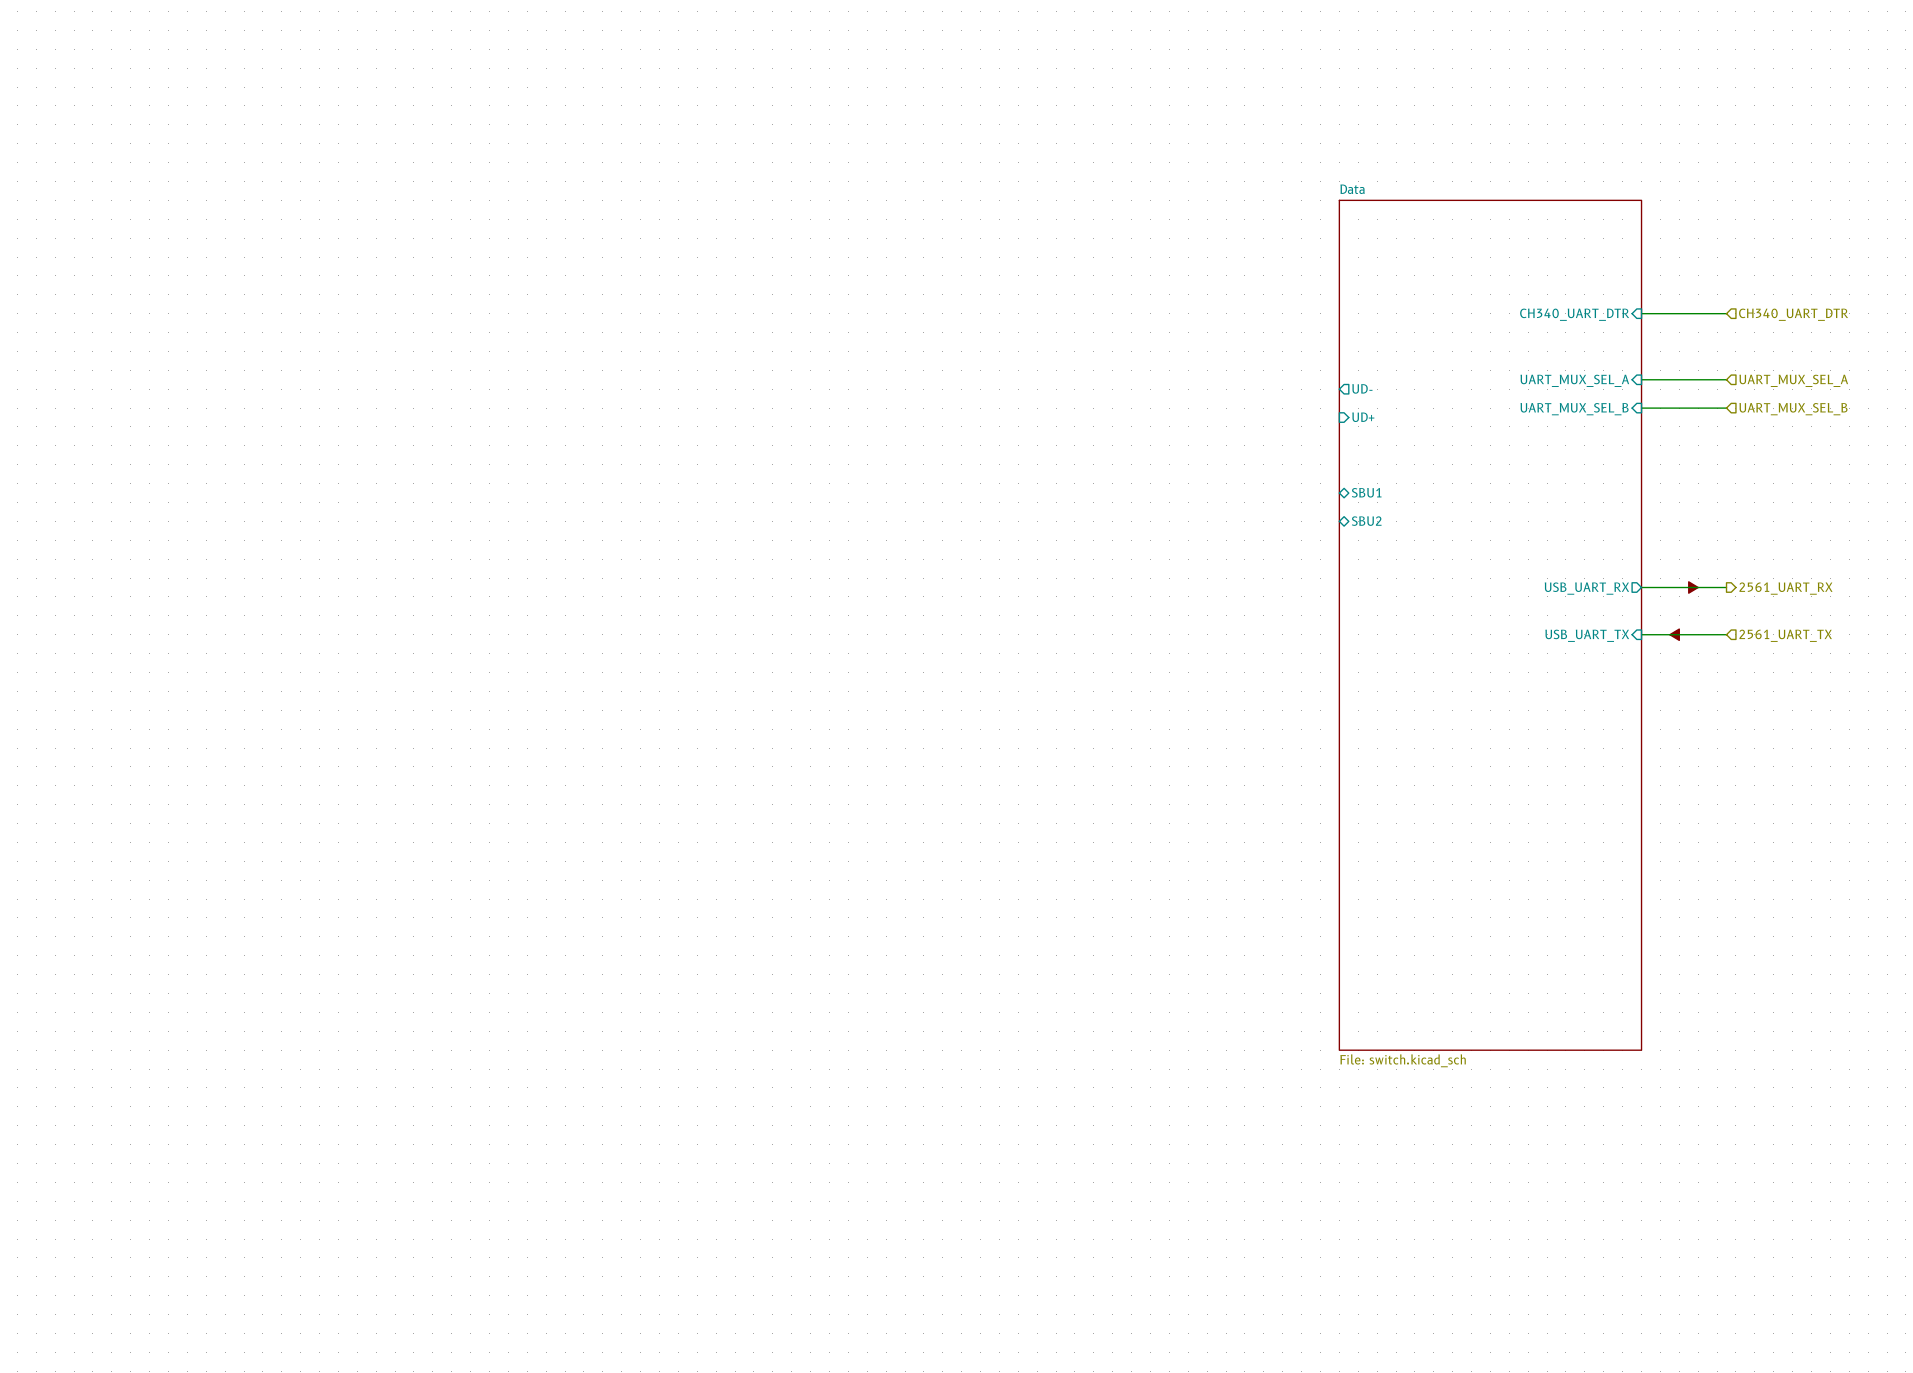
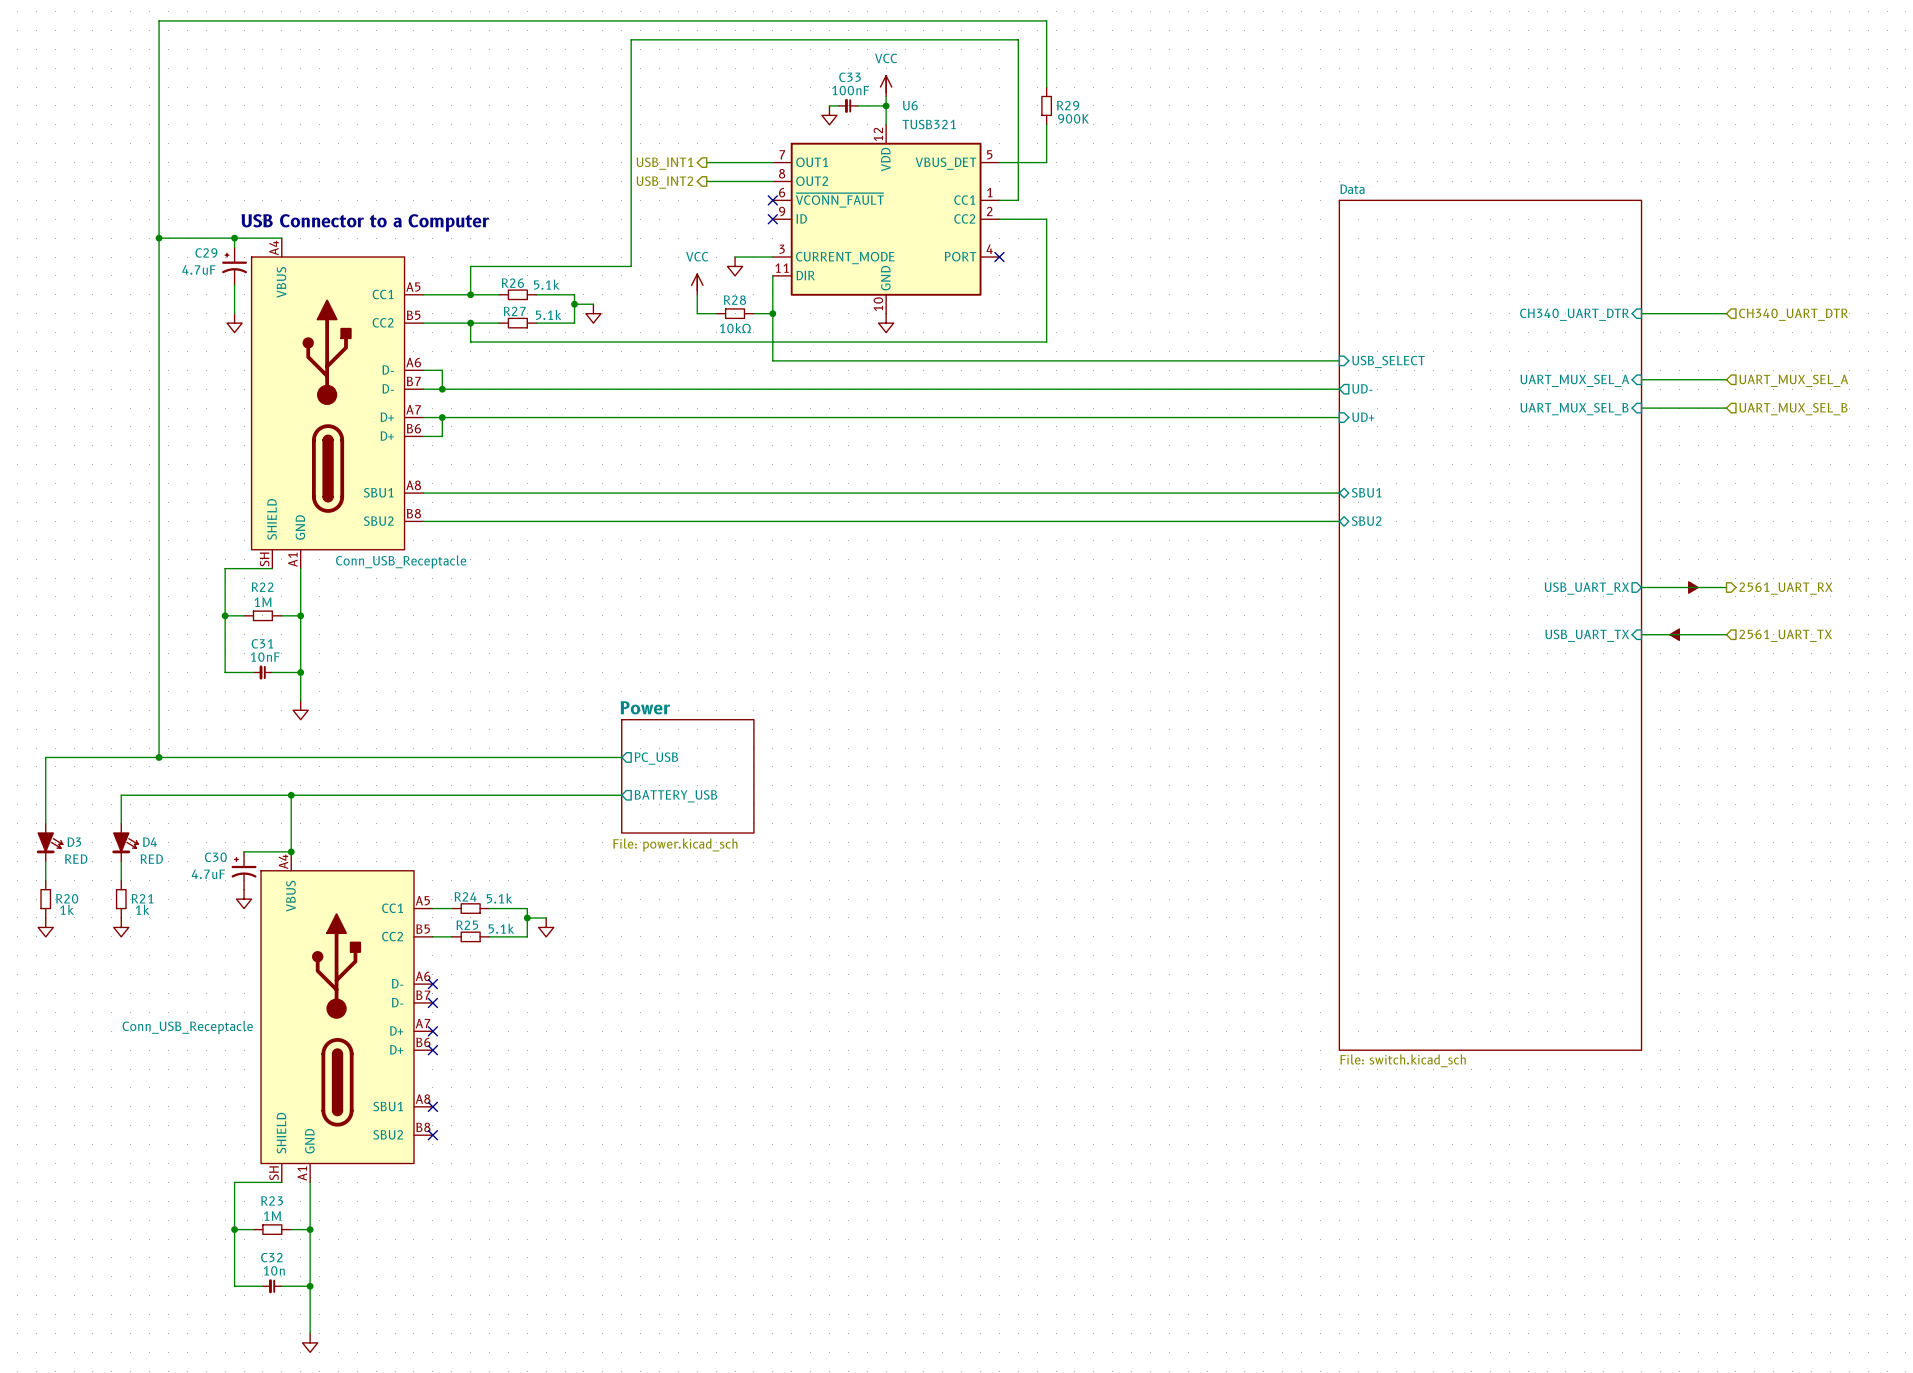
power symbol: none -> VCC (886, 86)
wire: none -> (1046, 87) (1046, 20) (159, 20) (159, 757)
wire: none -> (886, 96) (886, 124)
wire: none -> (829, 105) (838, 105)
C33: none -> 100nF (848, 105)
wire: none -> (857, 105) (886, 105)
junction: none -> (886, 105)
R29: none -> 900K (1046, 105)
power symbol: none -> (829, 115)
wire: none -> (1046, 124) (1046, 162) (999, 162)
wire: none -> (706, 162) (772, 162)
hierarchical label: none -> USB_INT1 (664, 163)
wire: none -> (706, 181) (772, 181)
hierarchical label: none -> USB_INT2 (664, 182)
no-connect mark: none -> (772, 200)
wire: none -> (999, 200) (1018, 200) (1018, 39) (631, 39) (631, 266) (470, 266) (470, 294)
no-connect mark: none -> (772, 219)
U6: none -> TUSB321 (886, 219)
wire: none -> (999, 219) (1046, 219) (1046, 342) (470, 342) (470, 323)
text: none -> USB Connector to a Computer (365, 222)
wire: none -> (159, 238) (281, 238)
junction: none -> (159, 238)
wire: none -> (234, 238) (234, 247)
junction: none -> (234, 238)
wire: none -> (735, 257) (772, 257)
no-connect mark: none -> (999, 257)
C29: none -> 4.7uF (234, 266)
power symbol: none -> (735, 266)
wire: none -> (772, 275) (772, 360) (1339, 360)
power symbol: none -> VCC (697, 284)
wire: none -> (234, 285) (234, 313)
wire: none -> (423, 294) (498, 294)
junction: none -> (470, 294)
R26: none -> 5.1k (517, 294)
wire: none -> (536, 294) (574, 294) (574, 323) (536, 323)
wire: none -> (697, 294) (697, 313) (716, 313)
wire: none -> (574, 304) (593, 304)
junction: none -> (574, 304)
power symbol: none -> (593, 313)
R28: none -> 10kΩ (735, 313)
wire: none -> (753, 313) (772, 313)
junction: none -> (772, 313)
power symbol: none -> (234, 323)
wire: none -> (423, 323) (498, 323)
junction: none -> (470, 323)
R27: none -> 5.1k (517, 323)
power symbol: none -> (886, 323)
sheet pin: none -> USB_SELECT (1388, 361)
wire: none -> (423, 370) (442, 370) (442, 389)
wire: none -> (423, 389) (1339, 389)
junction: none -> (442, 389)
part: none -> Conn_USB_Receptacle (337, 403)
wire: none -> (423, 417) (1339, 417)
wire: none -> (442, 417) (442, 436) (423, 436)
junction: none -> (442, 417)
wire: none -> (423, 493) (1339, 493)
wire: none -> (423, 521) (1339, 521)
wire: none -> (272, 568) (225, 568) (225, 672) (253, 672)
wire: none -> (300, 568) (300, 700)
wire: none -> (225, 615) (244, 615)
junction: none -> (225, 615)
R22: none -> 1M (262, 615)
wire: none -> (281, 615) (300, 615)
junction: none -> (300, 615)
C31: none -> 10nF (262, 672)
wire: none -> (272, 672) (300, 672)
junction: none -> (300, 672)
power symbol: none -> (300, 710)
junction: none -> (159, 757)
wire: none -> (621, 757) (45, 757) (45, 823)
sheet pin: none -> PC_USB (656, 758)
sheet Power: none -> File: power.kicad_sch (687, 776)
wire: none -> (291, 795) (291, 851) (244, 851)
junction: none -> (291, 795)
wire: none -> (621, 795) (121, 795) (121, 823)
sheet pin: none -> BATTERY_USB (675, 796)
D3: none -> RED (49, 842)
D4: none -> RED (125, 842)
junction: none -> (291, 851)
wire: none -> (45, 861) (45, 880)
wire: none -> (121, 861) (121, 880)
C30: none -> 4.7uF (244, 870)
R20: none -> 1k (45, 899)
R21: none -> 1k (121, 899)
power symbol: none -> (244, 899)
wire: none -> (432, 908) (451, 908)
R24: none -> 5.1k (470, 908)
wire: none -> (489, 908) (527, 908) (527, 936) (489, 936)
wire: none -> (527, 917) (546, 917)
junction: none -> (527, 917)
power symbol: none -> (45, 927)
power symbol: none -> (121, 927)
power symbol: none -> (546, 927)
wire: none -> (432, 936) (451, 936)
R25: none -> 5.1k (470, 936)
no-connect mark: none -> (432, 984)
no-connect mark: none -> (432, 1002)
part: none -> Conn_USB_Receptacle (346, 1017)
no-connect mark: none -> (432, 1031)
no-connect mark: none -> (432, 1050)
no-connect mark: none -> (432, 1106)
no-connect mark: none -> (432, 1135)
wire: none -> (281, 1182) (234, 1182) (234, 1286) (262, 1286)
wire: none -> (310, 1182) (310, 1333)
wire: none -> (234, 1229) (253, 1229)
junction: none -> (234, 1229)
R23: none -> 1M (272, 1229)
wire: none -> (291, 1229) (310, 1229)
junction: none -> (310, 1229)
C32: none -> 10n (272, 1286)
wire: none -> (281, 1286) (310, 1286)
junction: none -> (310, 1286)
power symbol: none -> (310, 1342)

